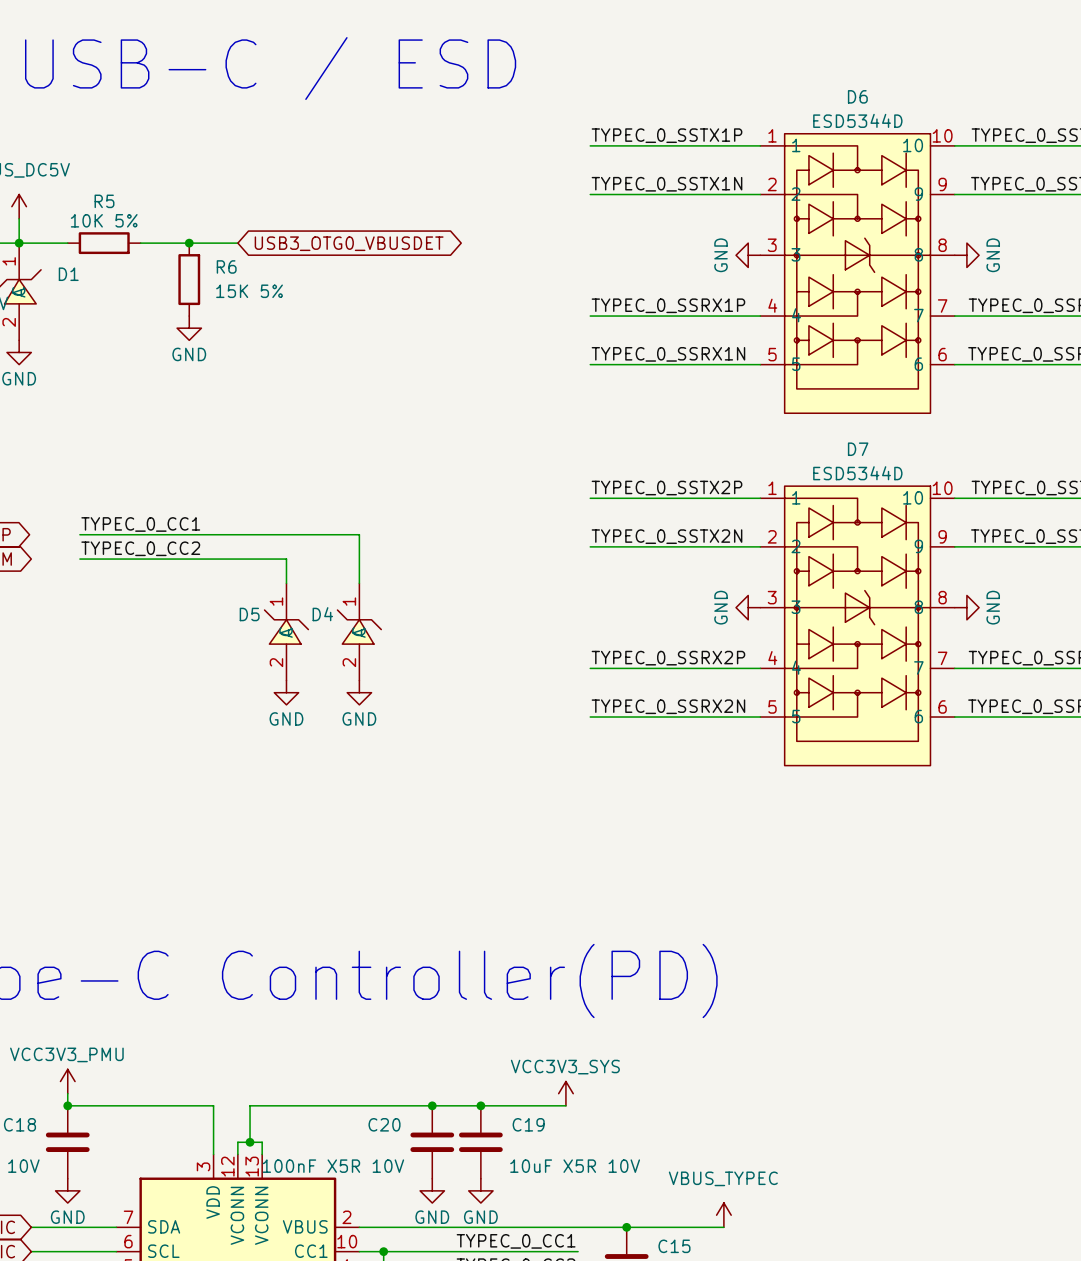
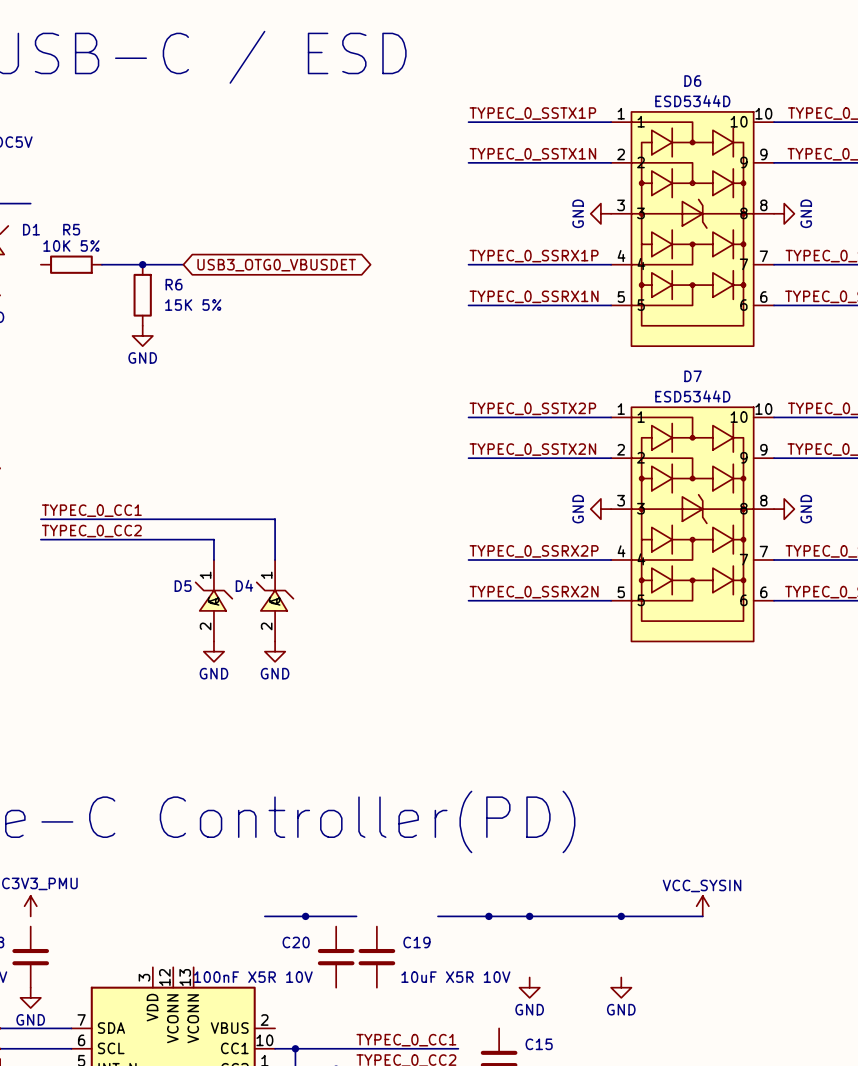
R5 position: (104, 243) -> (71, 264)
wire: (140, 243) (237, 243) -> (101, 264) (183, 264)
junction: (189, 243) -> none
global label position: USB3_OTG0_VBUSDET (349, 243) -> USB3_OTG0_VBUSDET (276, 265)
R6 position: (189, 279) -> (142, 295)
junction: none -> (142, 264)
power symbol position: GND (189, 328) -> GND (142, 335)
label position: TYPEC_0_CC1 (140, 524) -> TYPEC_0_CC1 (91, 510)
wire: (79, 534) (359, 534) (359, 583) -> (40, 519) (275, 519) (275, 560)
label position: TYPEC_0_CC2 (140, 548) -> TYPEC_0_CC2 (91, 531)
wire: (79, 559) (286, 559) (286, 583) -> (40, 539) (213, 539) (213, 560)
D5 position: (286, 631) -> (213, 600)
D4 position: (359, 631) -> (275, 600)
power symbol: GND (286, 692) -> none
power symbol: GND (359, 692) -> none
power symbol: none -> GND (213, 651)
power symbol: none -> GND (275, 651)
power symbol: none -> VCC_SYSIN (702, 906)
wire: (67, 1093) (67, 1105) (213, 1105) (213, 1154) -> none
wire: none -> (264, 916) (356, 916)
wire: none -> (438, 916) (702, 916)
power symbol: VCC3V3_SYS (565, 1093) -> none
junction: none -> (488, 916)
junction: none -> (529, 916)
junction: none -> (621, 916)
junction: (67, 1105) -> none
junction position: (432, 1105) -> (305, 916)
junction: (480, 1105) -> none
wire: (565, 1105) (250, 1105) (250, 1142) -> none
junction: (250, 1142) -> none
wire: (237, 1154) (237, 1142) (262, 1142) (262, 1154) -> none
power symbol: none -> GND (529, 987)
power symbol: none -> GND (621, 987)
power symbol: GND (432, 1190) -> none
power symbol: GND (480, 1190) -> none
power symbol: VBUS_TYPEC (723, 1215) -> none
wire: (359, 1227) (723, 1227) -> none
junction: (626, 1227) -> none

